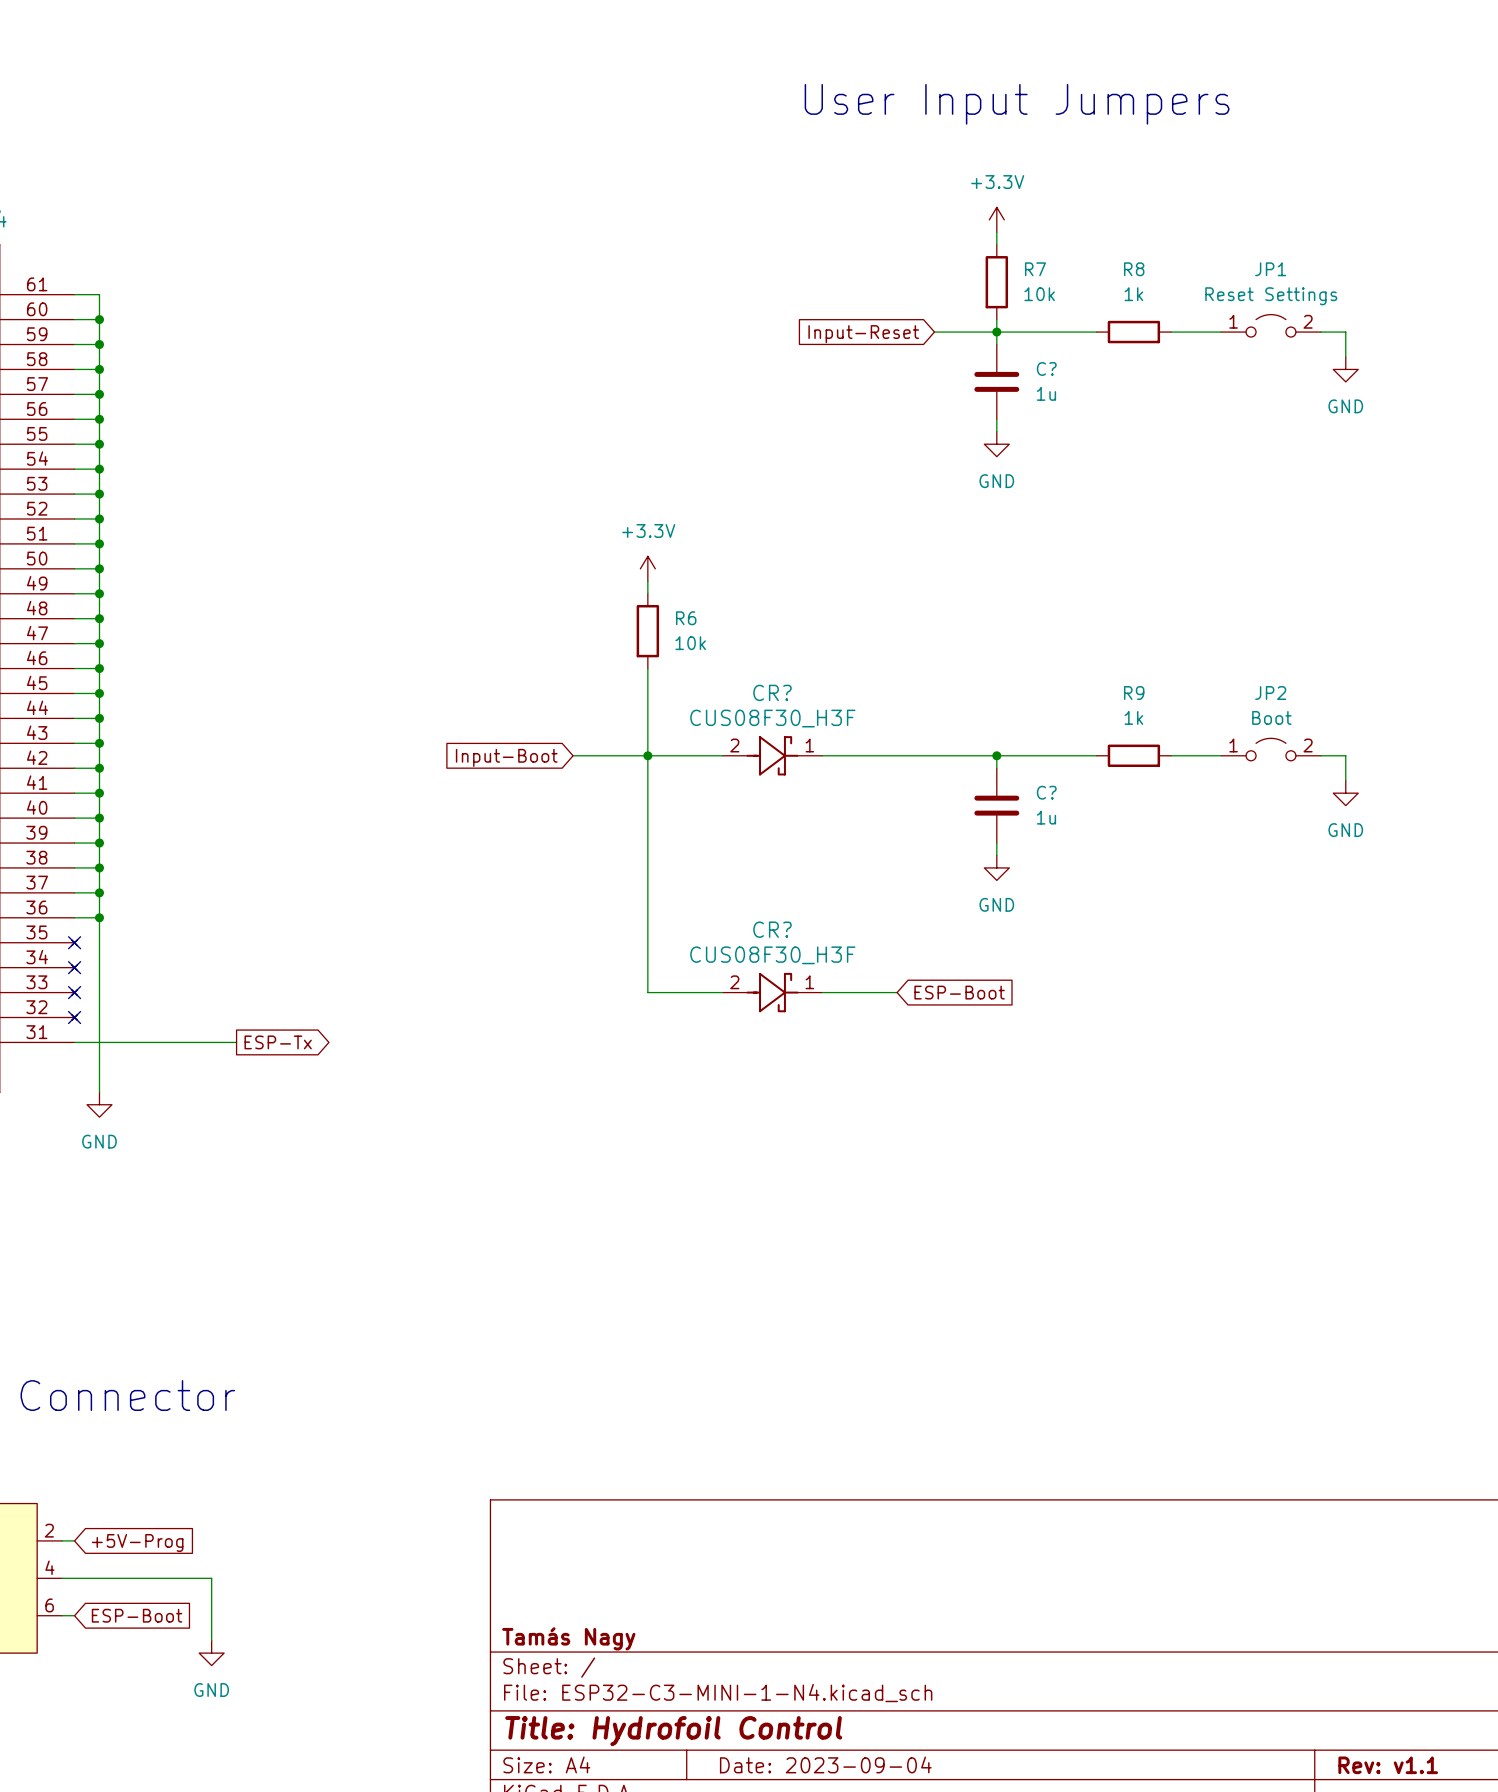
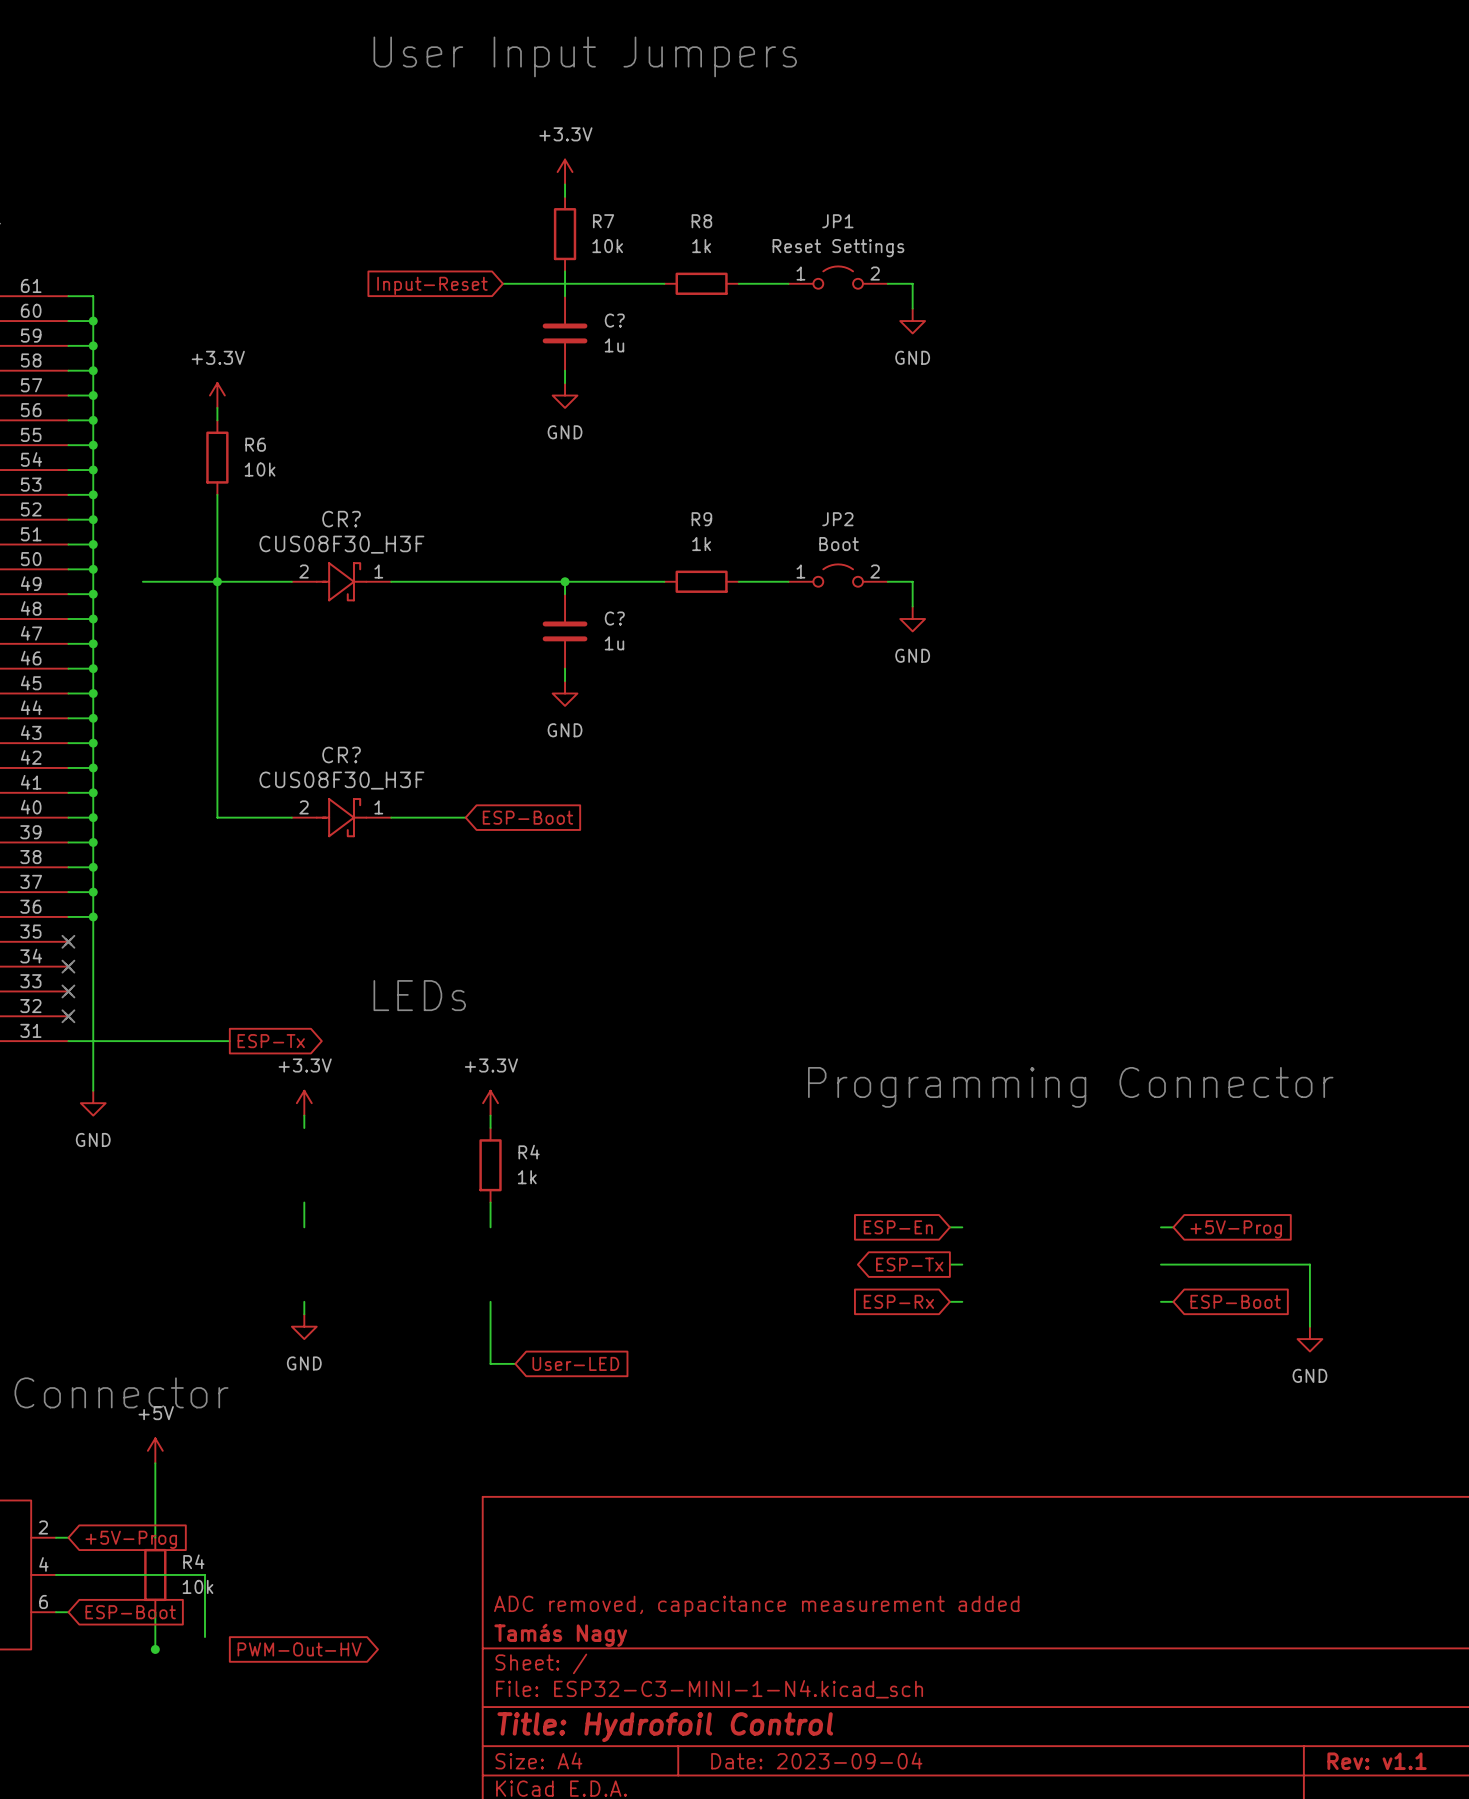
text: none -> User Input Jumpers (585, 56)
text: User Input Jumpers (1017, 104) -> none
power symbol: none -> +3.3V (565, 172)
wire: none -> (565, 184) (565, 196)
power symbol: +3.3V (996, 219) -> none
wire: (996, 232) (996, 244) -> none
wire: none -> (565, 271) (565, 296)
wire: none -> (502, 283) (664, 283)
wire: none -> (738, 283) (788, 283)
wire: none -> (887, 283) (912, 283) (912, 308)
R7 position: (996, 282) -> (565, 234)
global label: none -> Input-Reset (432, 285)
power symbol: none -> GND (912, 321)
wire: (996, 319) (996, 344) -> none
JP1 position: (1270, 325) -> (838, 277)
C?: none -> 1u (565, 333)
wire: (934, 332) (1096, 332) -> none
junction: (996, 332) -> none
R8 position: (1133, 332) -> (701, 283)
wire: (1171, 332) (1221, 332) -> none
wire: (1320, 332) (1345, 332) (1345, 356) -> none
global label: Input-Reset (863, 334) -> none
wire: none -> (565, 370) (565, 383)
power symbol: GND (1345, 369) -> none
C?: 1u (996, 381) -> none
power symbol: none -> +3.3V (217, 395)
power symbol: none -> GND (565, 395)
wire: none -> (217, 407) (217, 420)
wire: (996, 419) (996, 431) -> none
power symbol: GND (996, 444) -> none
wire: none -> (217, 494) (217, 817) (291, 817)
power symbol: +3.3V (647, 568) -> none
wire: none -> (142, 581) (291, 581)
junction: none -> (217, 581)
CR?: none -> CUS08F30_H3F (341, 581)
wire: none -> (391, 581) (664, 581)
junction: none -> (565, 581)
wire: (647, 581) (647, 593) -> (565, 581) (565, 594)
wire: none -> (738, 581) (788, 581)
wire: none -> (887, 581) (912, 581) (912, 606)
power symbol: none -> GND (912, 619)
C?: none -> 1u (565, 631)
R6 position: (647, 631) -> (217, 457)
wire: none -> (565, 668) (565, 681)
wire: (647, 668) (647, 992) (722, 992) -> none
power symbol: none -> GND (565, 693)
JP2 position: (1270, 749) -> (838, 575)
wire: (573, 755) (722, 755) -> none
junction: (647, 755) -> none
CR?: CUS08F30_H3F (772, 755) -> none
wire: (822, 755) (1096, 755) -> none
wire: (996, 755) (996, 768) -> none
junction: (996, 755) -> none
R9 position: (1133, 755) -> (701, 581)
wire: (1171, 755) (1221, 755) -> none
wire: (1320, 755) (1345, 755) (1345, 780) -> none
global label: Input-Boot (506, 757) -> none
power symbol: GND (1345, 793) -> none
C?: 1u (996, 805) -> none
CR?: none -> CUS08F30_H3F (341, 817)
wire: none -> (391, 817) (465, 817)
global label: none -> ESP-Boot (527, 817)
wire: (996, 843) (996, 855) -> none
power symbol: GND (996, 867) -> none
CR?: CUS08F30_H3F (772, 992) -> none
wire: (822, 992) (897, 992) -> none
global label: ESP-Boot (959, 992) -> none
text: none -> LEDs (419, 995)
text: none -> Programming Connector (1070, 1087)
power symbol: none -> +3.3V (304, 1103)
power symbol: none -> +3.3V (490, 1103)
wire: none -> (304, 1115) (304, 1128)
wire: none -> (490, 1115) (490, 1128)
R4: none -> 1k (490, 1165)
wire: none -> (304, 1202) (304, 1227)
wire: none -> (490, 1202) (490, 1227)
global label: none -> ESP-En (898, 1227)
wire: none -> (949, 1227) (962, 1227)
wire: none -> (1160, 1227) (1173, 1227)
global label: none -> +5V-Prog (1236, 1229)
global label: none -> ESP-Tx (909, 1264)
wire: none -> (949, 1264) (962, 1264)
wire: none -> (1160, 1264) (1309, 1264) (1309, 1326)
wire: none -> (304, 1301) (304, 1314)
wire: none -> (490, 1301) (490, 1363) (515, 1363)
global label: none -> ESP-Rx (898, 1301)
wire: none -> (949, 1301) (962, 1301)
wire: none -> (1160, 1301) (1173, 1301)
global label: none -> ESP-Boot (1235, 1301)
power symbol: none -> GND (304, 1326)
power symbol: none -> GND (1309, 1339)
global label: none -> User-LED (575, 1363)
power symbol: none -> +5V (155, 1450)
wire: none -> (155, 1463) (155, 1537)
R4: none -> 10k (155, 1574)
title block: none -> ADC removed, capacitance measurement added (756, 1606)
wire: none -> (155, 1612) (155, 1649)
junction: none -> (155, 1649)
power symbol: GND (211, 1653) -> none
global label: none -> PWM-Out-HV (299, 1649)

